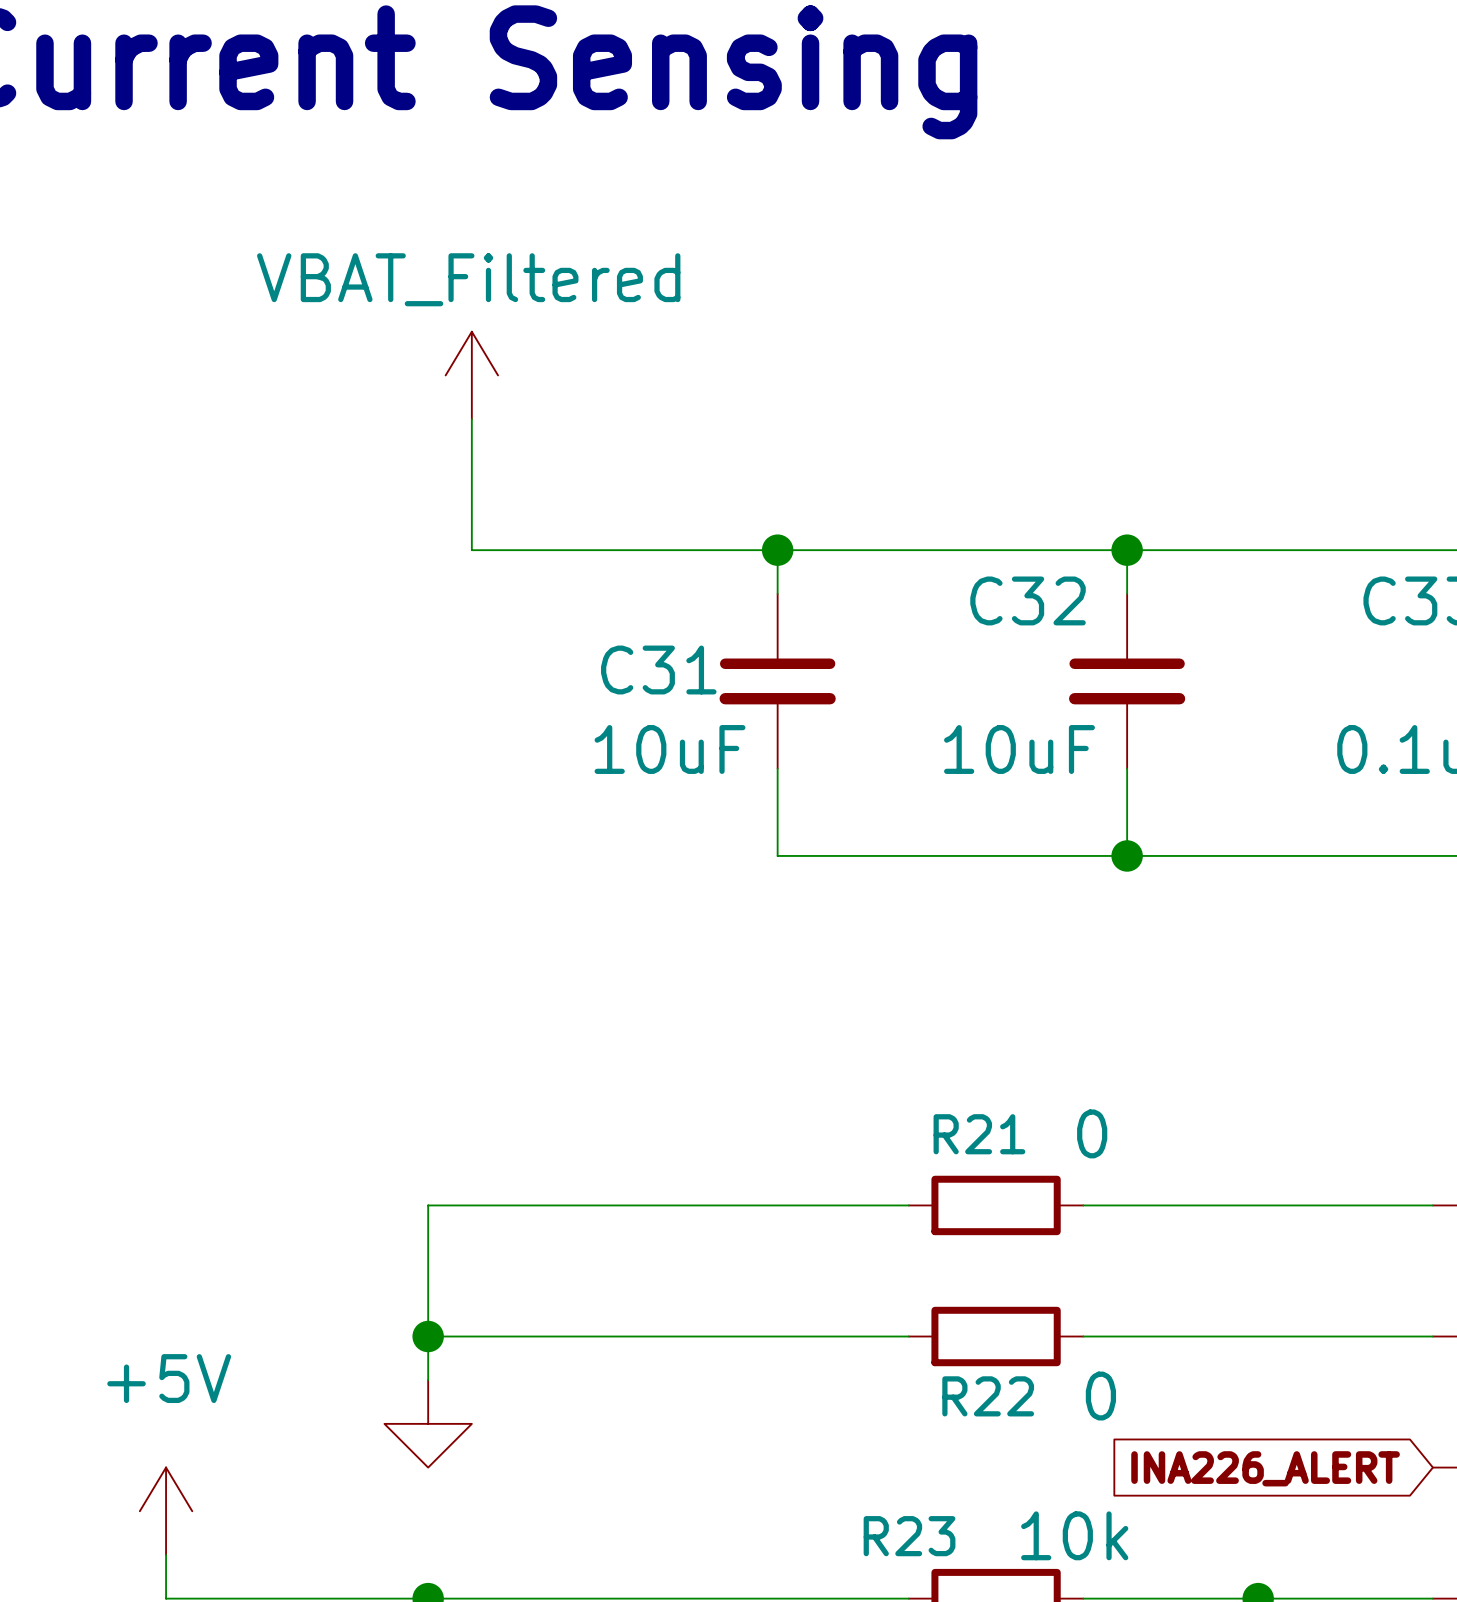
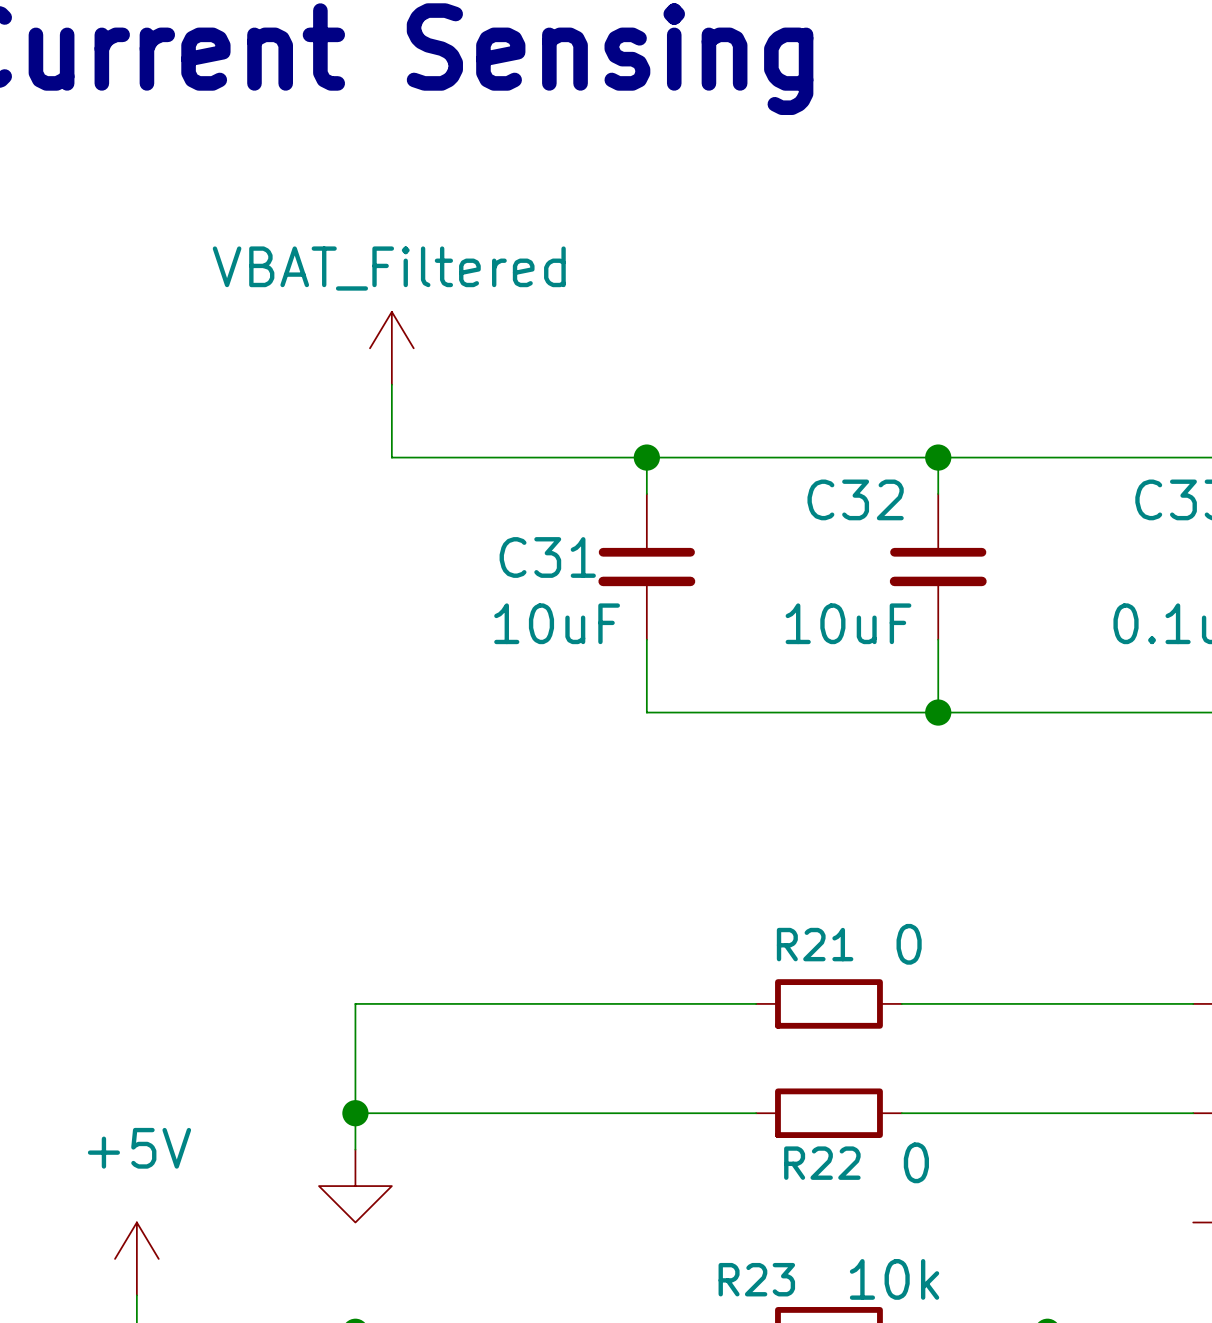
power symbol position: VBAT_Filtered (471, 375) -> VBAT_Filtered (391, 348)
global label: INA226_ALERT (1265, 1468) -> none

